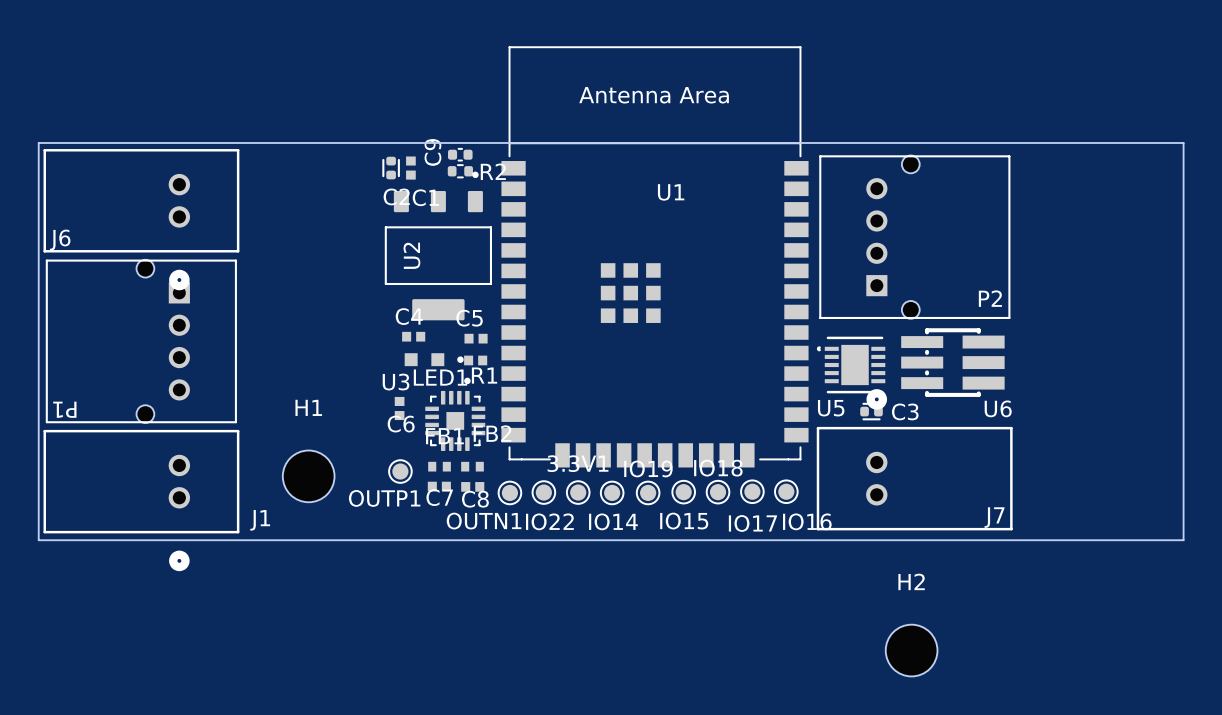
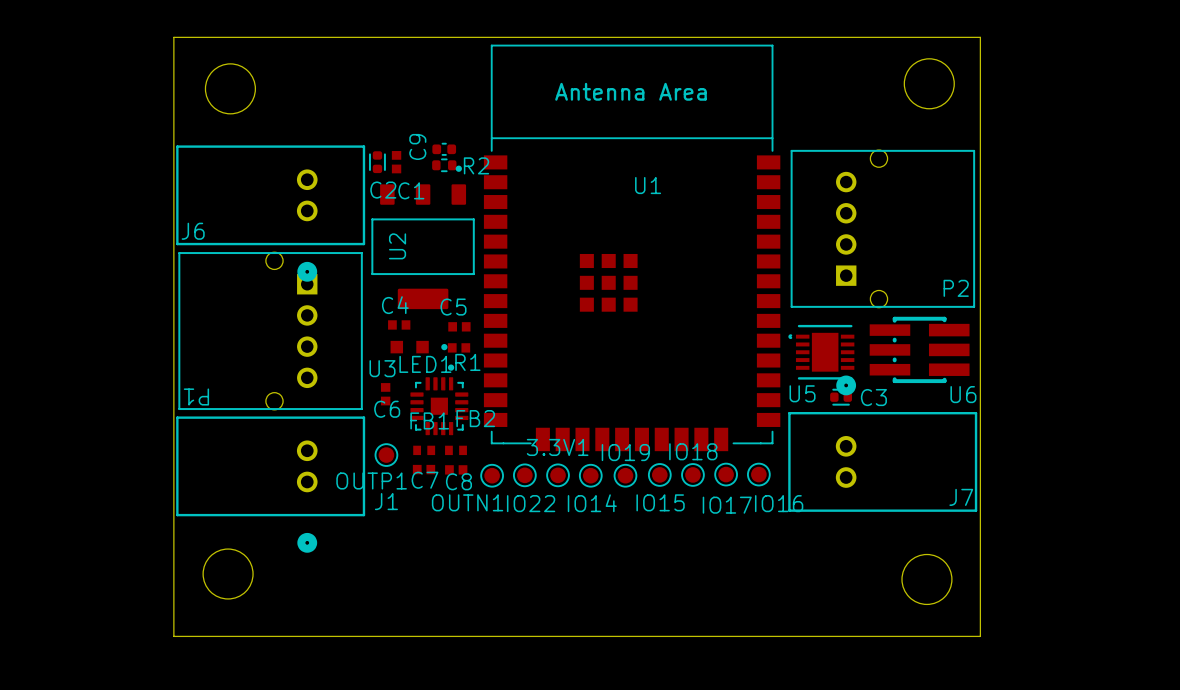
round board edge: none -> [903, 58, 955, 110]
round board edge: none -> [205, 63, 256, 115]
board edge: (38, 142) (1183, 142) (1183, 540) (38, 540) (38, 142) -> (173, 37) (173, 636) (980, 636) (980, 37) (173, 37)
J6 position: (141, 219) -> (270, 213)
P1 position: (141, 341) -> (270, 331)
H1: (308, 476) -> none
J1 position: (141, 500) -> (270, 484)
round board edge: none -> [202, 548, 254, 600]
round board edge: none -> [901, 554, 953, 605]
H2: (911, 650) -> none

